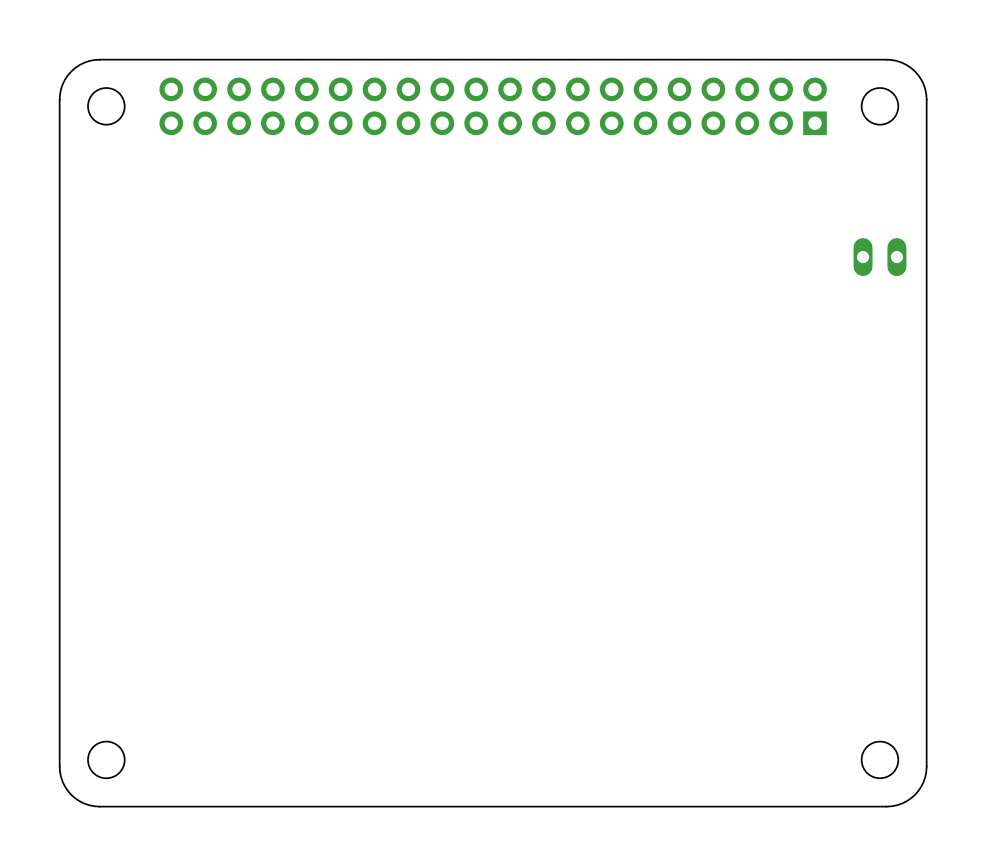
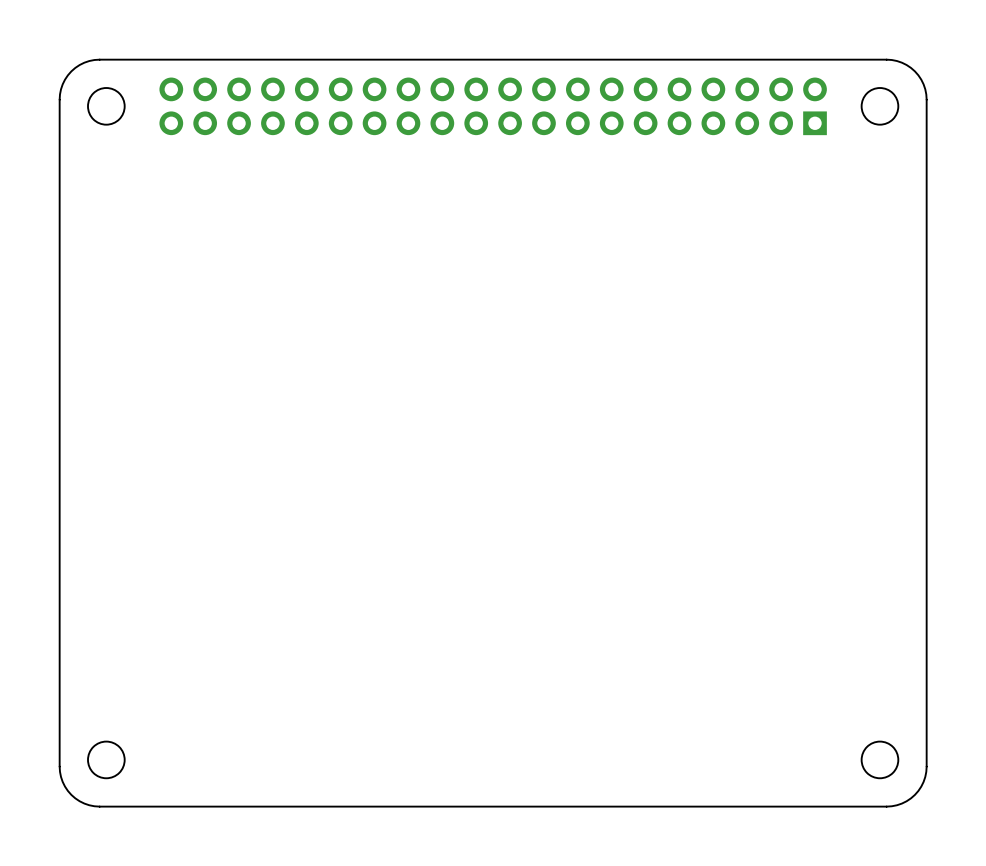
part: (879, 257) -> none

